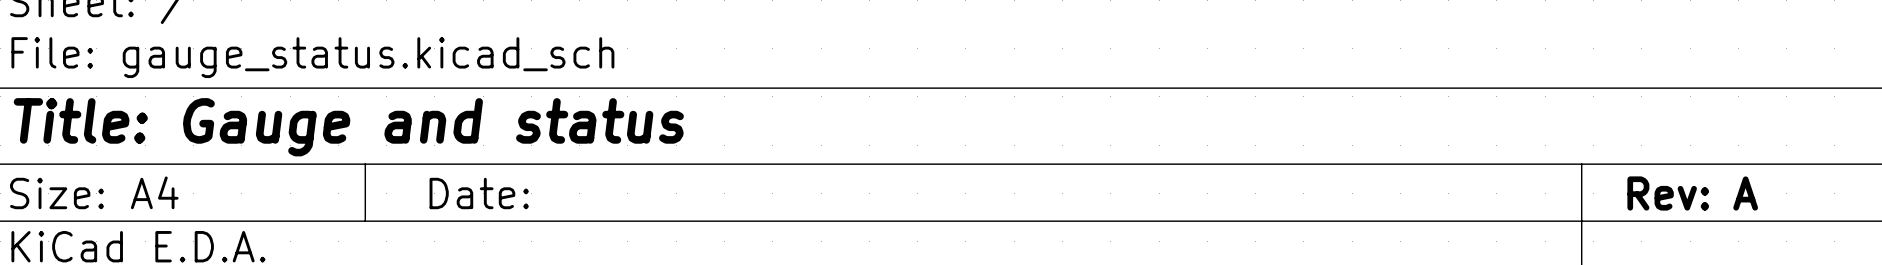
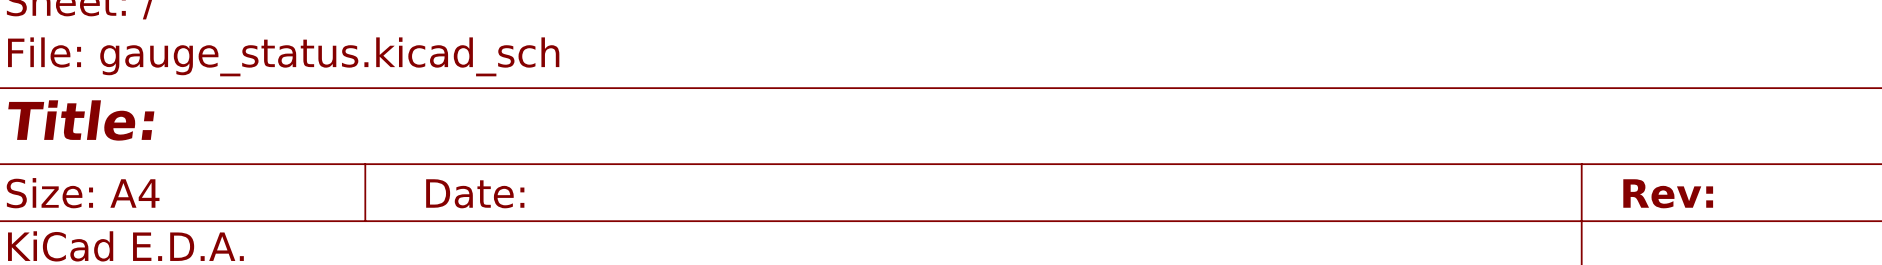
title block: Title: Gauge and status (348, 127) -> Title: (81, 120)
title block: Rev: A (1692, 193) -> Rev: (1668, 193)

